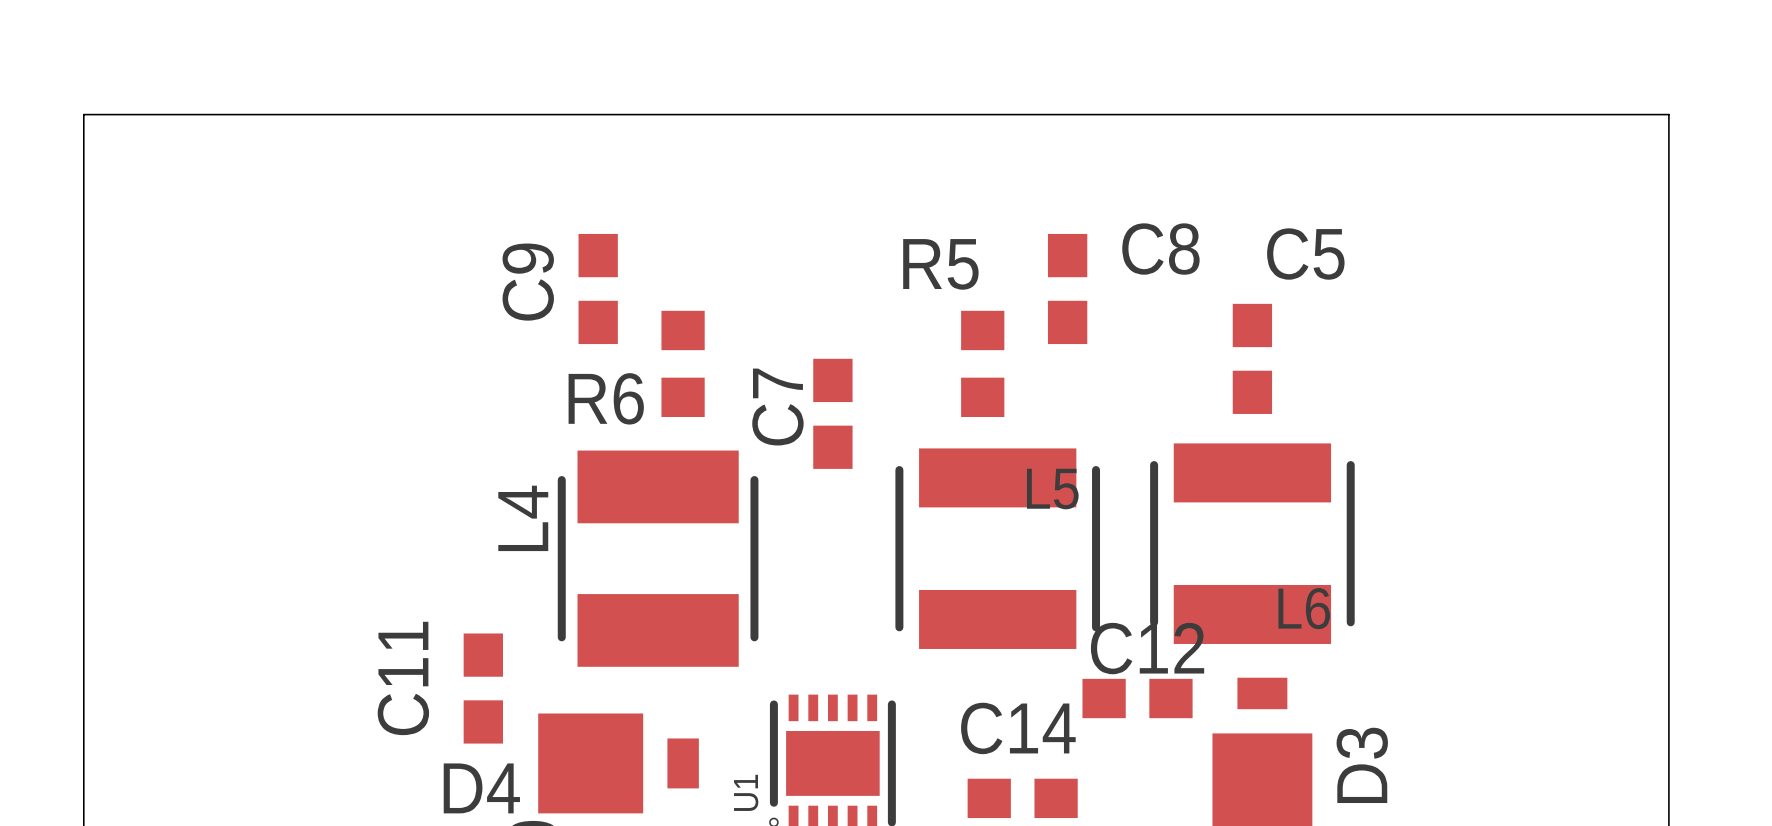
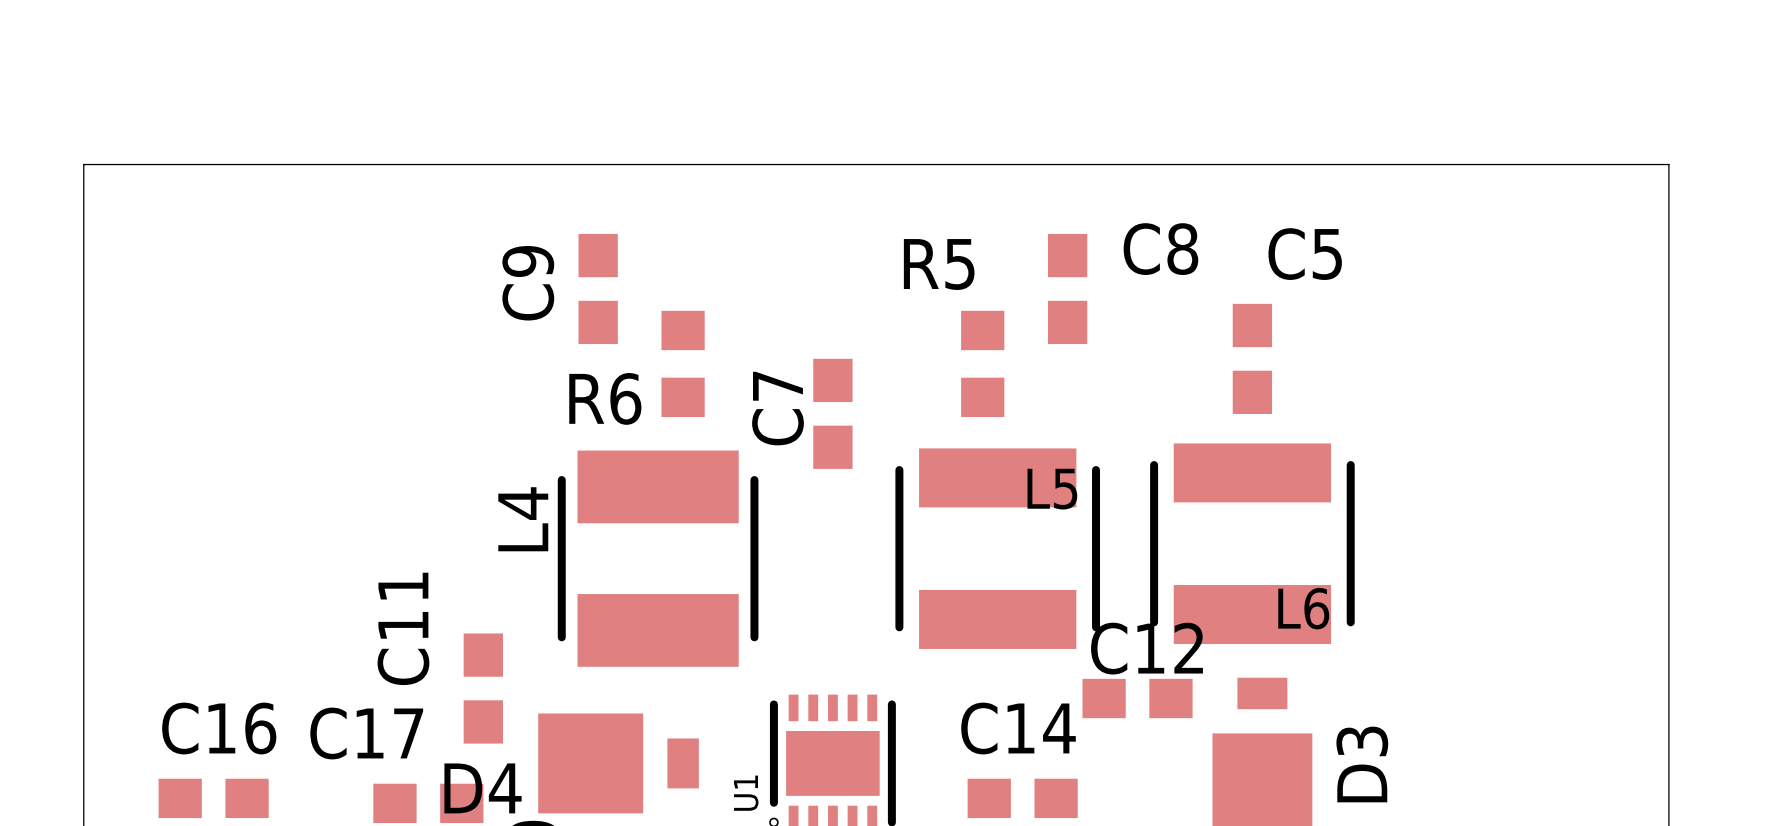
board edge: (83, 164) (83, 114) (1668, 114) (1668, 164) -> (83, 164) (1668, 164)
C11 name position: C11 (403, 678) -> C11 (403, 628)
C16: none -> (213, 798)
C17: none -> (428, 803)

